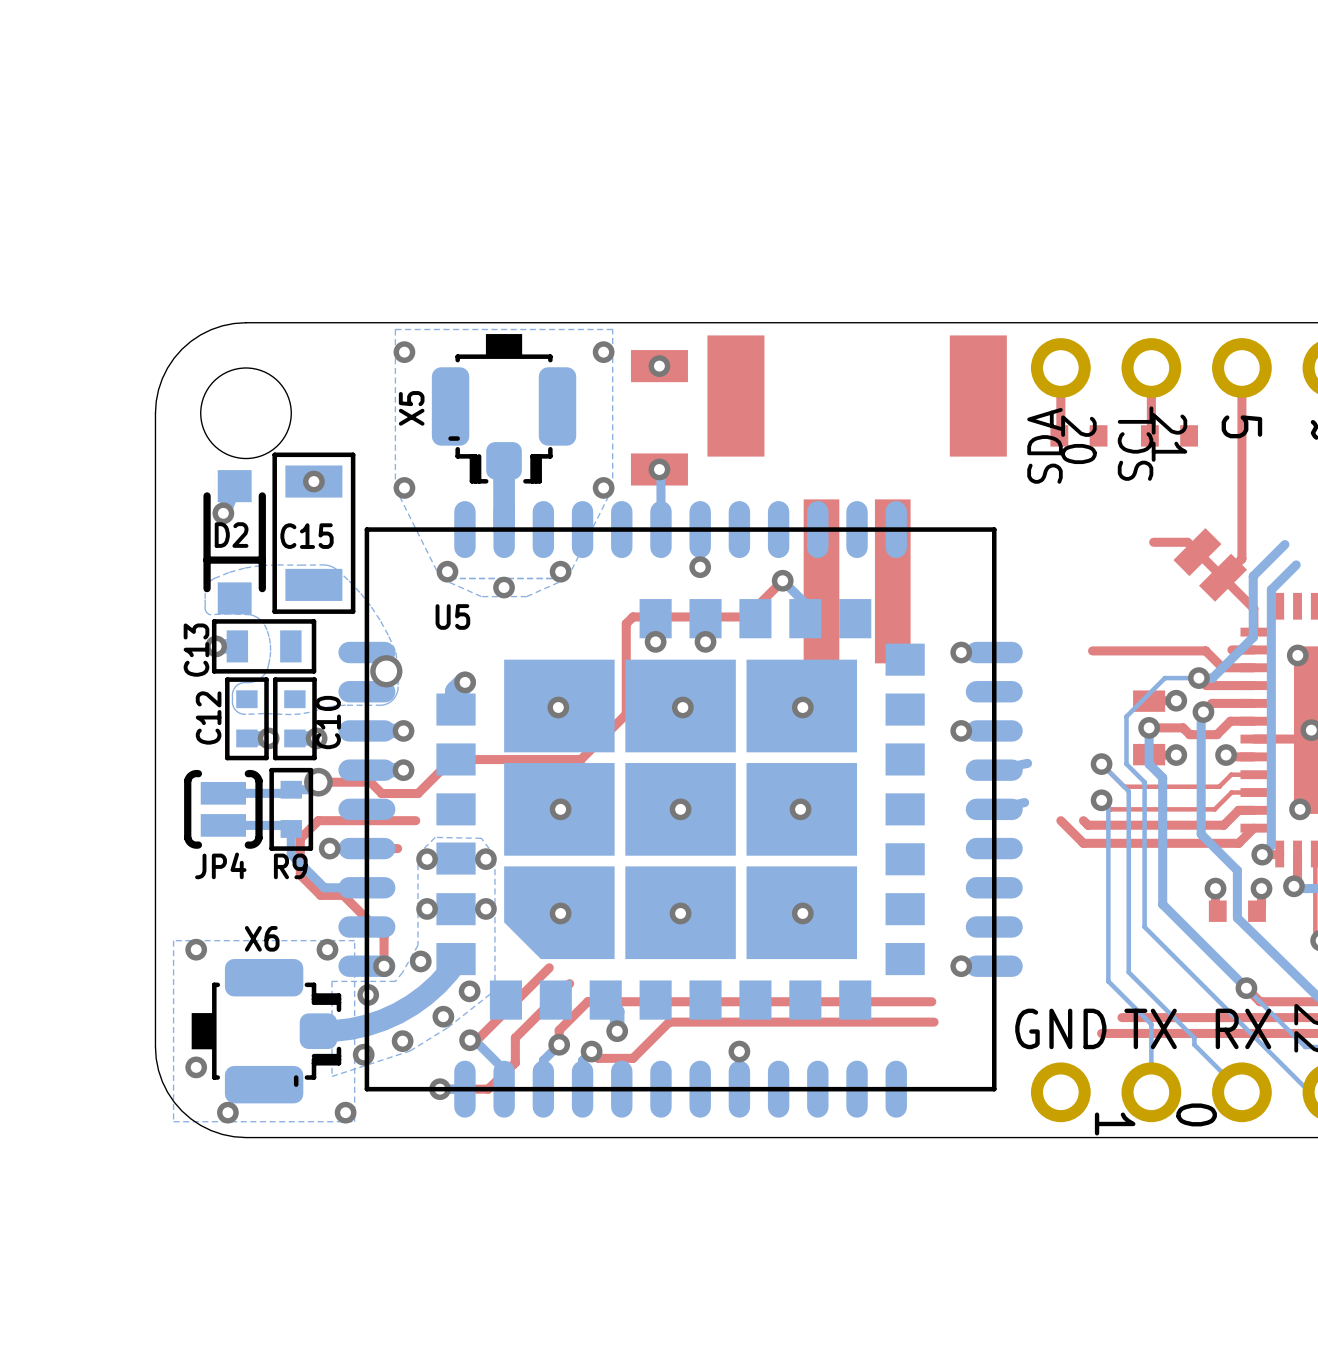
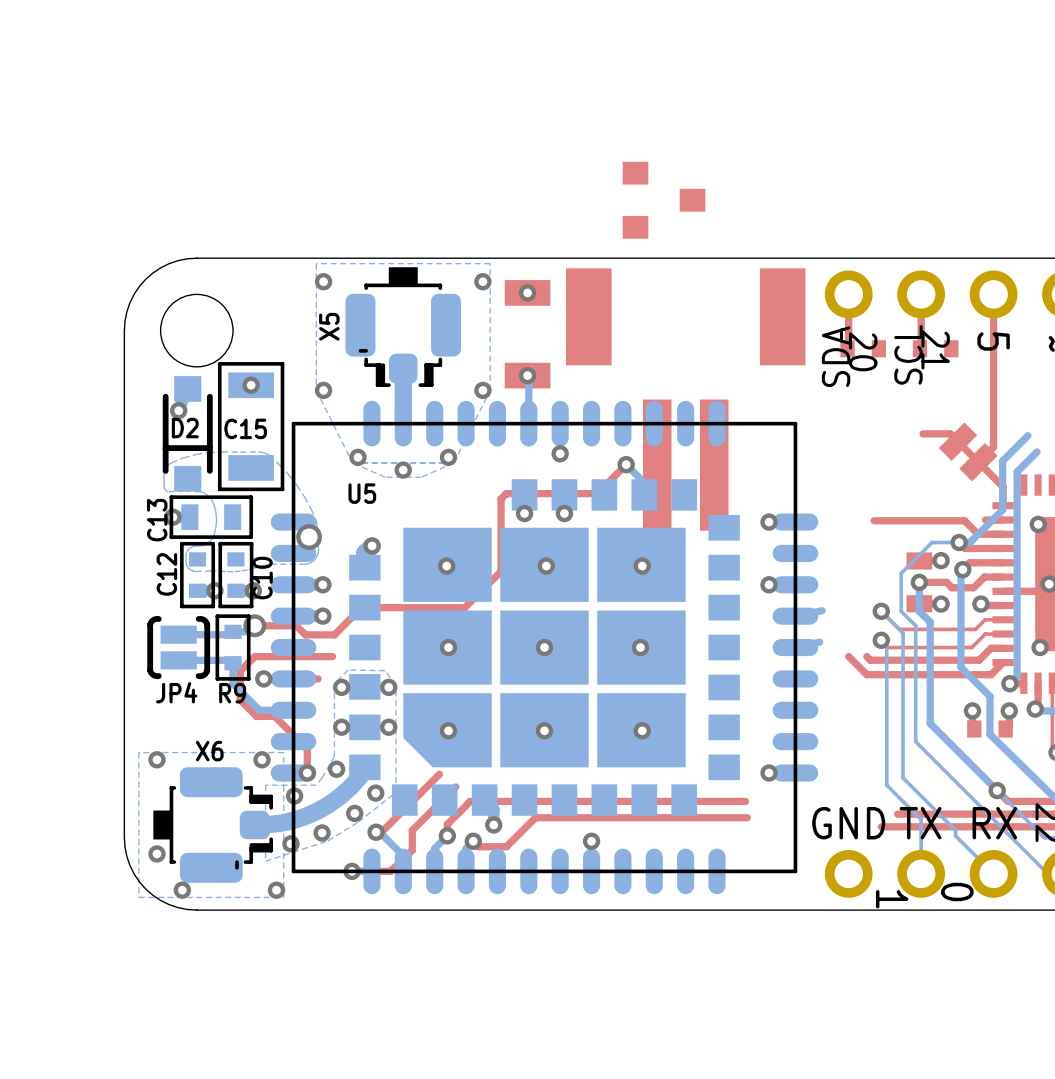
part: none -> (664, 200)

